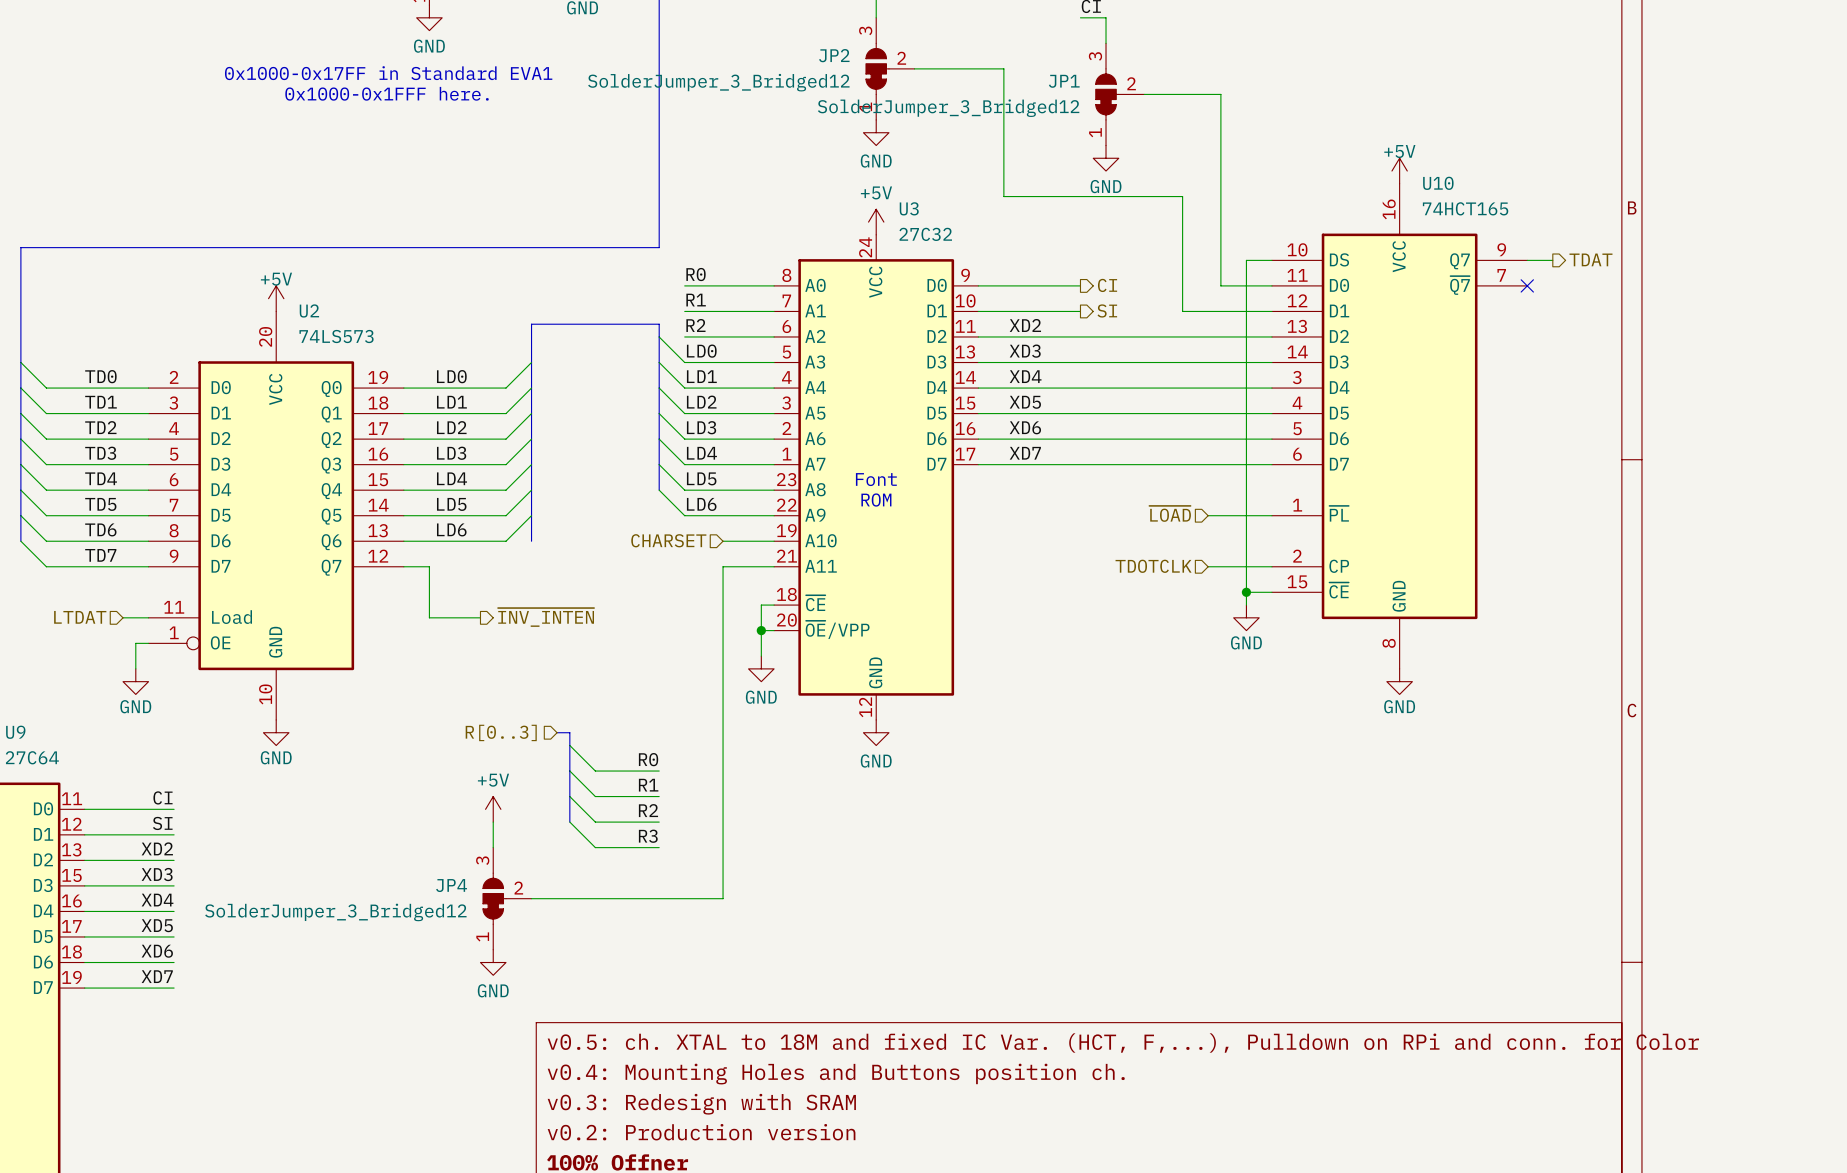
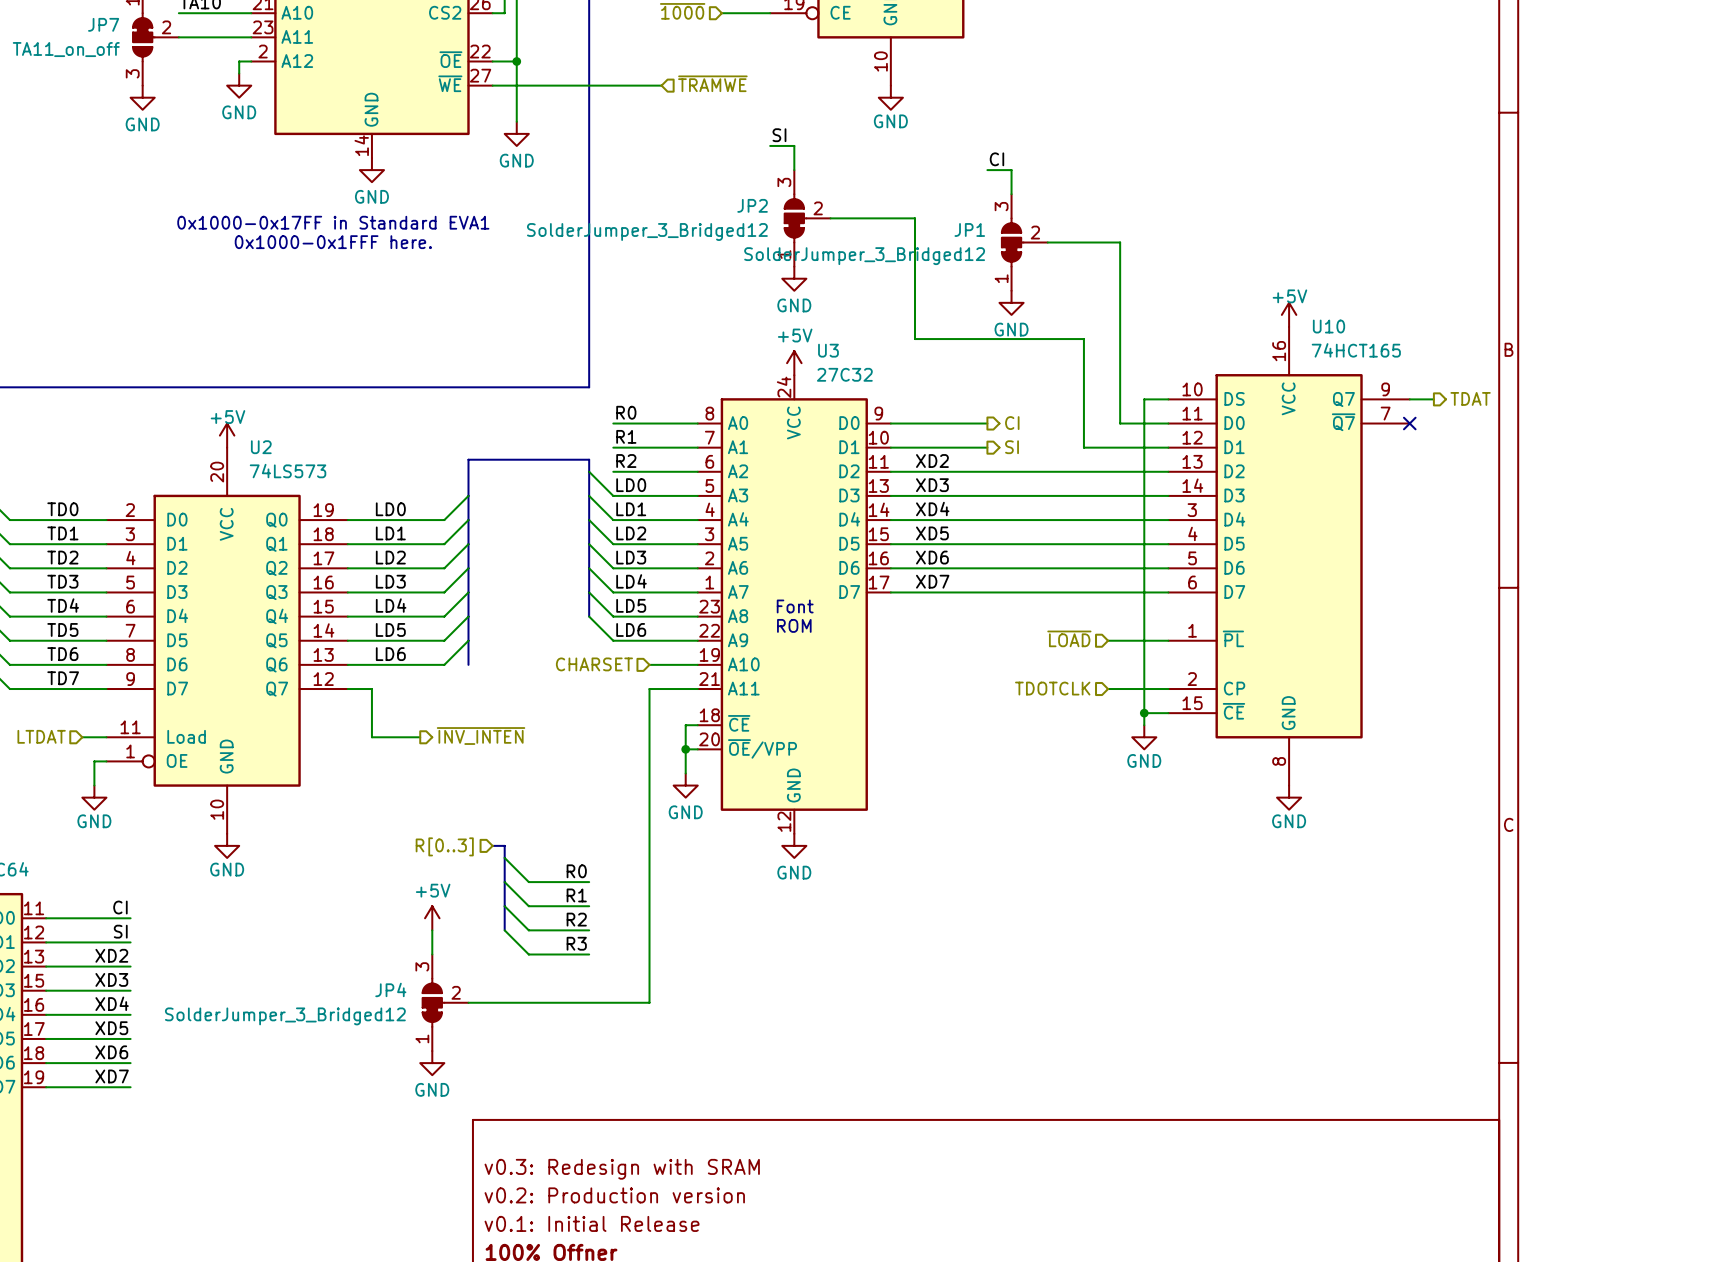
title block: v0.5: ch. XTAL to 18M and fixed IC Var. (HCT, F,...), Pulldown on RPi and conn. for Color (1123, 1043) -> none
title block: v0.4: Mounting Holes and Buttons position ch. (836, 1074) -> v0.3: Redesign with SRAM (622, 1169)
title block: v0.3: Redesign with SRAM (701, 1104) -> v0.2: Production version (614, 1195)
title block: v0.2: Production version (701, 1132) -> v0.1: Initial Release (592, 1223)

